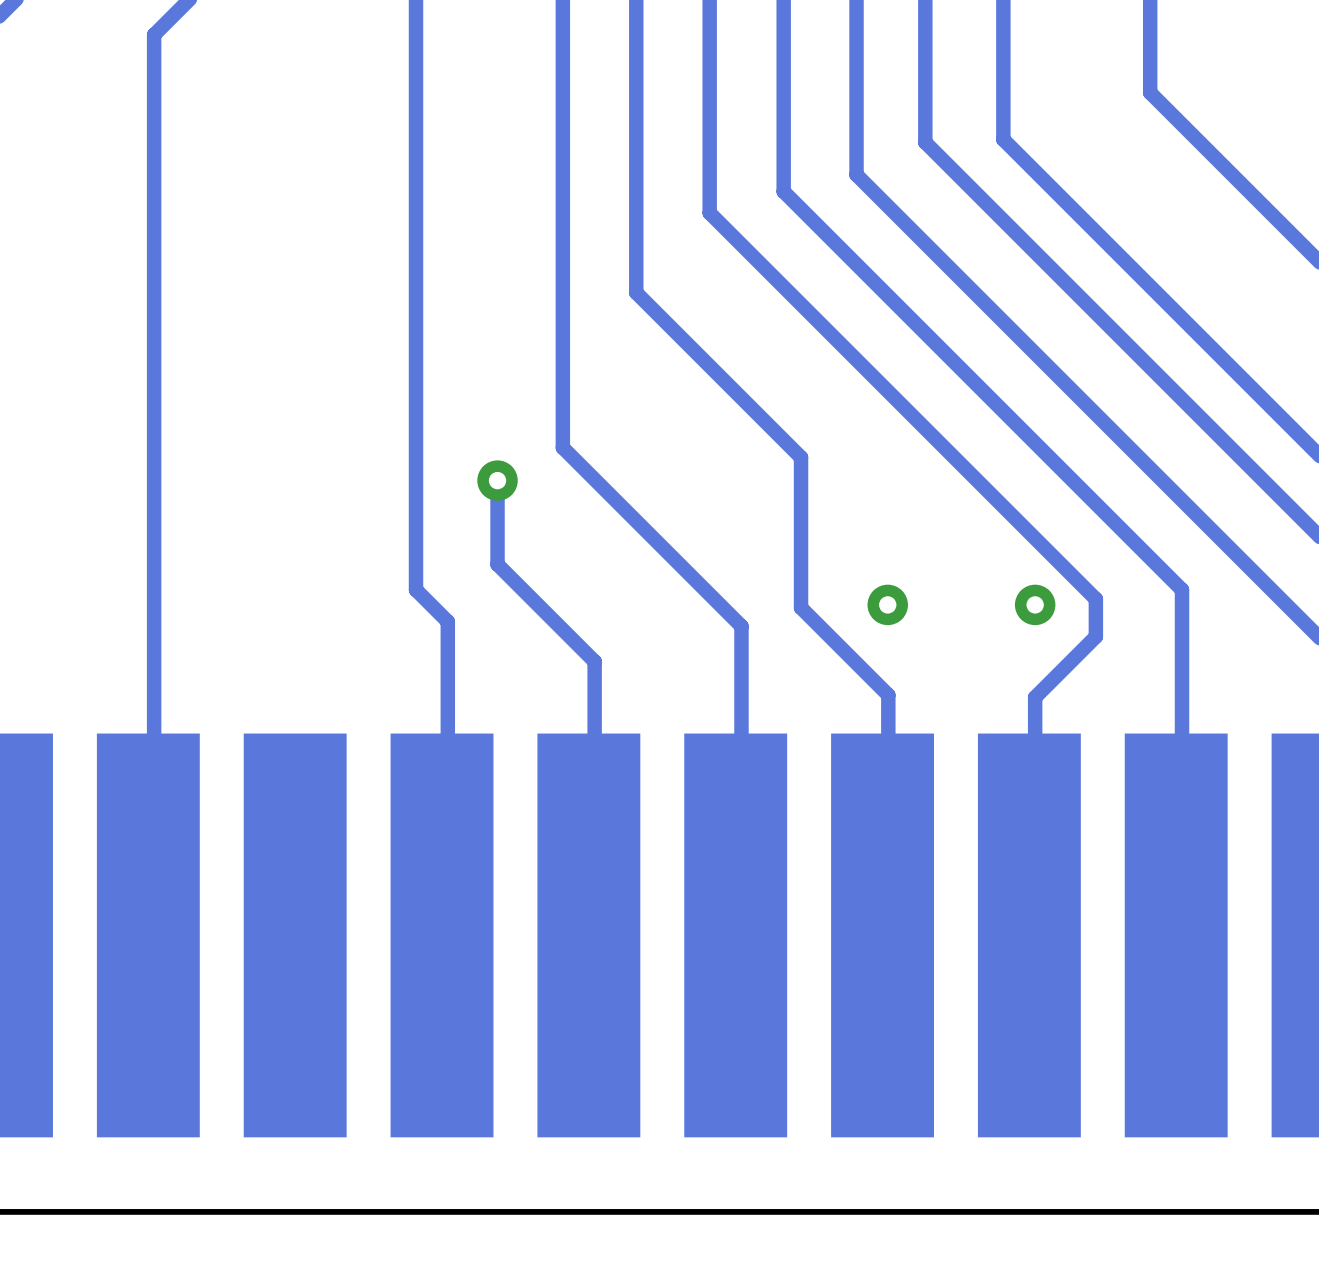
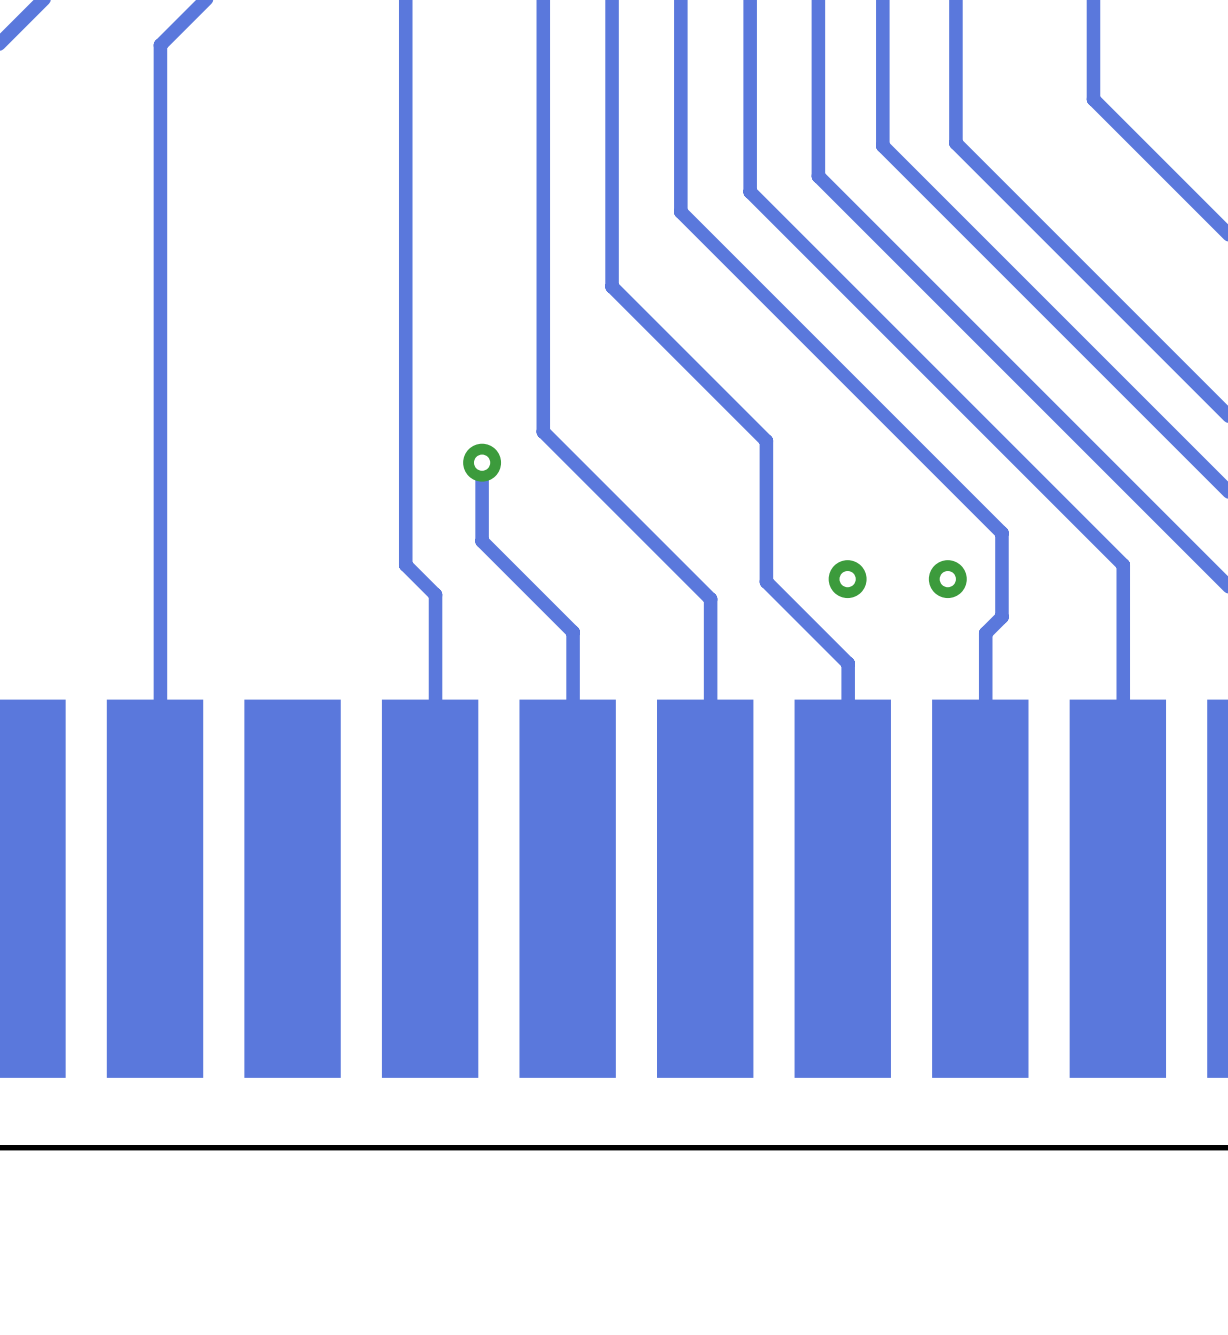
track: (1052, 555) (1095, 599) (1095, 636) (1035, 697) -> (1001, 533) (1001, 617) (985, 633) (985, 665)
via position: (1035, 604) -> (947, 579)

